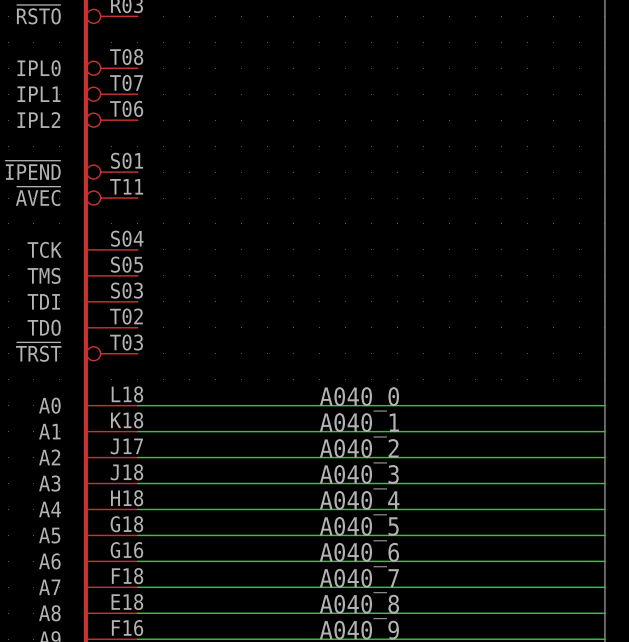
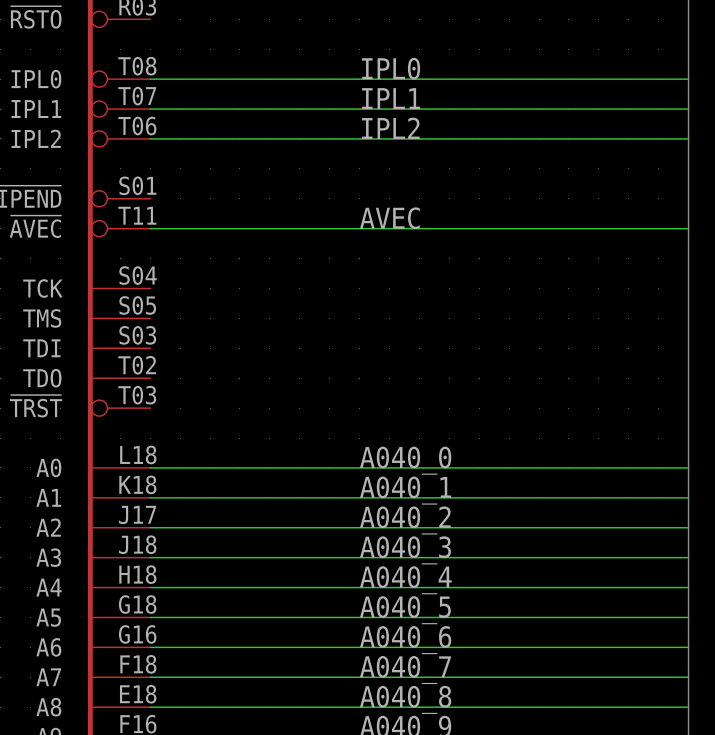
label: none -> IPL0 (391, 68)
wire: none -> (150, 79) (688, 79)
label: none -> IPL1 (391, 98)
wire: none -> (150, 109) (688, 109)
label: none -> IPL2 (390, 128)
wire: none -> (150, 138) (688, 138)
label: none -> AVEC (389, 218)
wire: none -> (150, 228) (688, 228)

